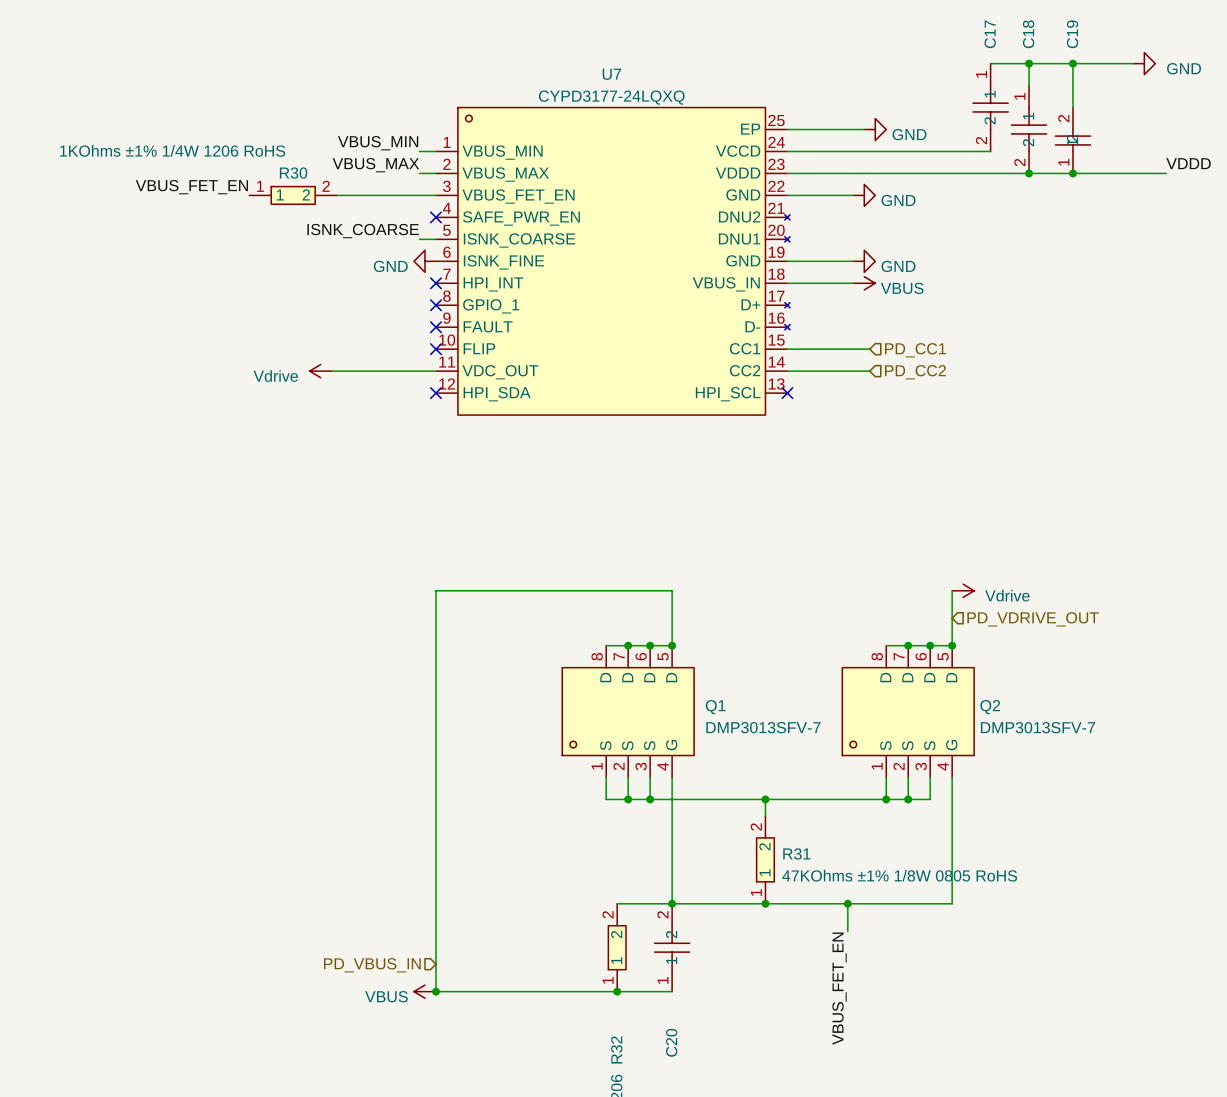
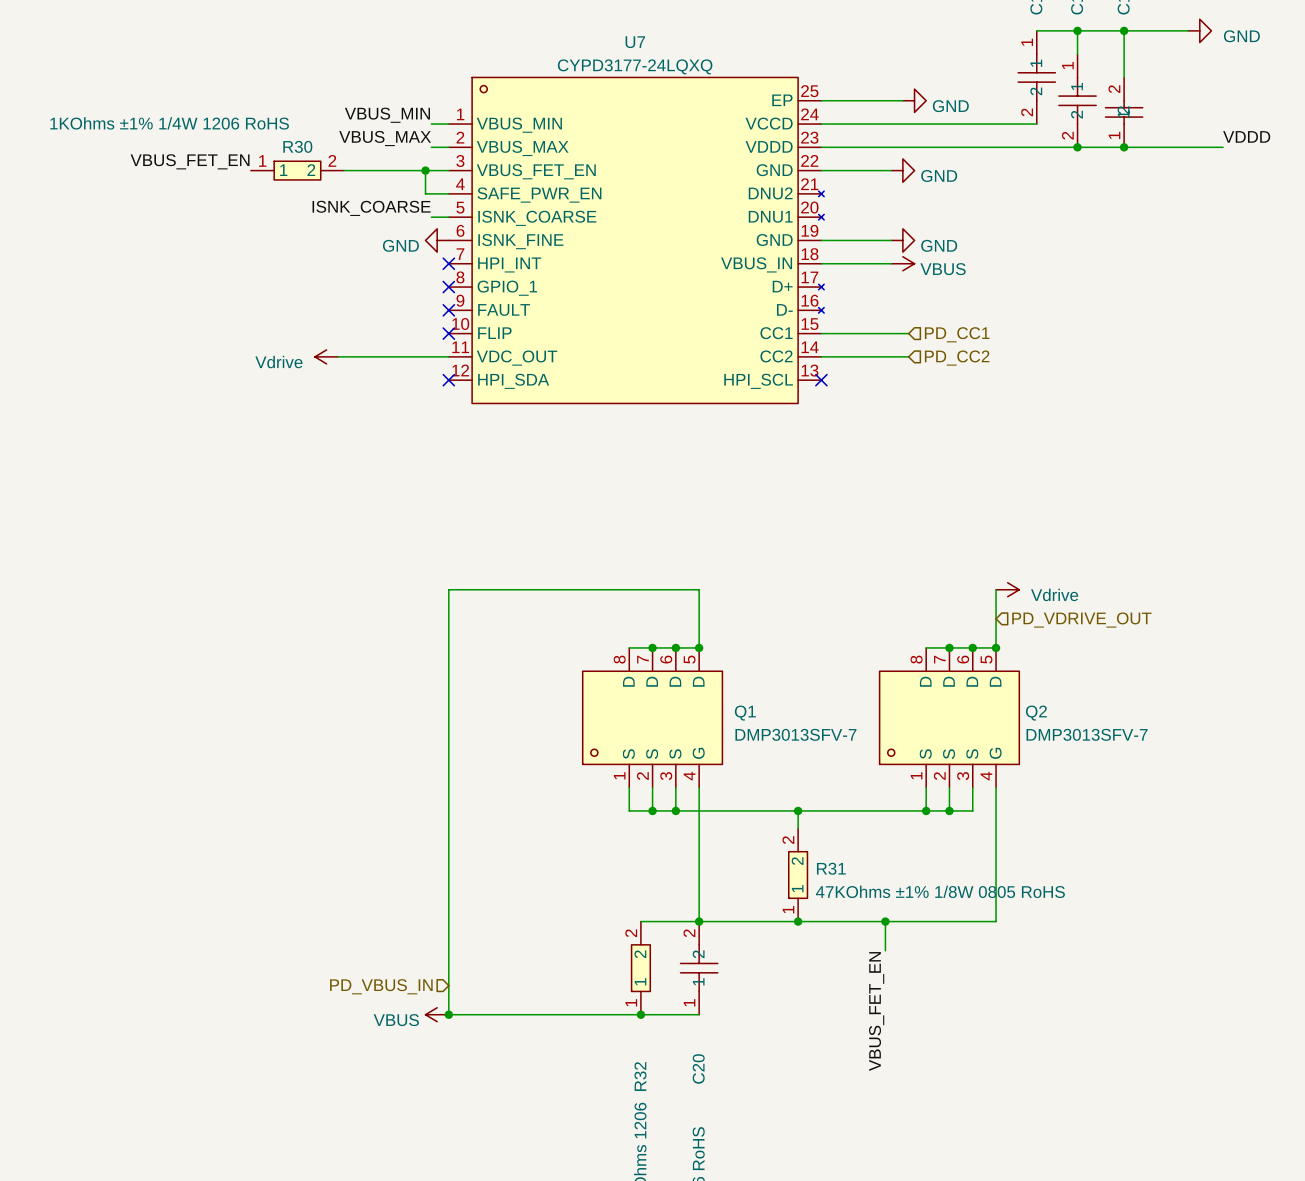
wire: none -> (425, 170) (425, 193) (448, 193)
junction: none -> (425, 170)
no-connect mark: (435, 217) -> none

